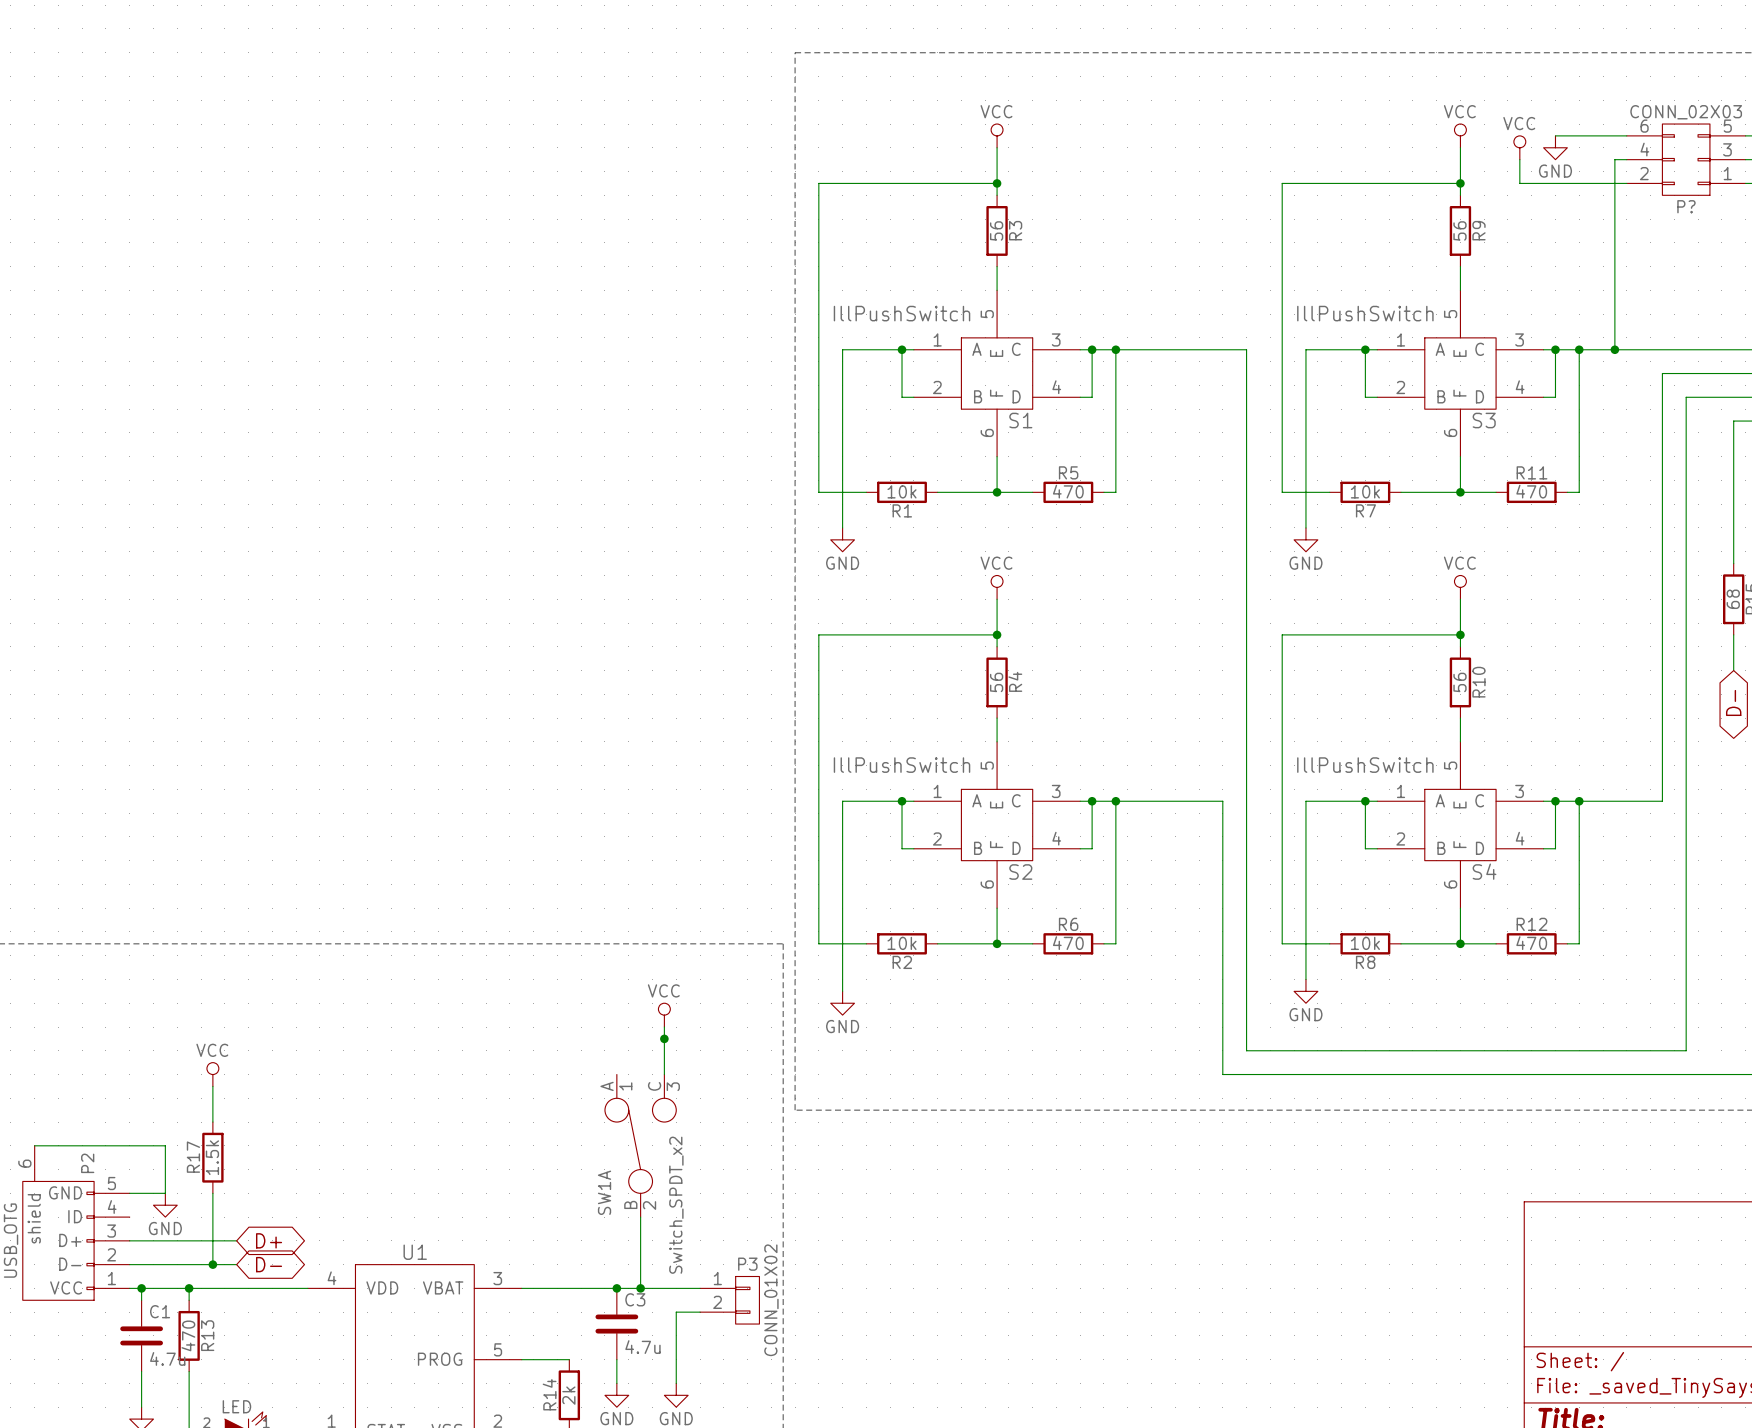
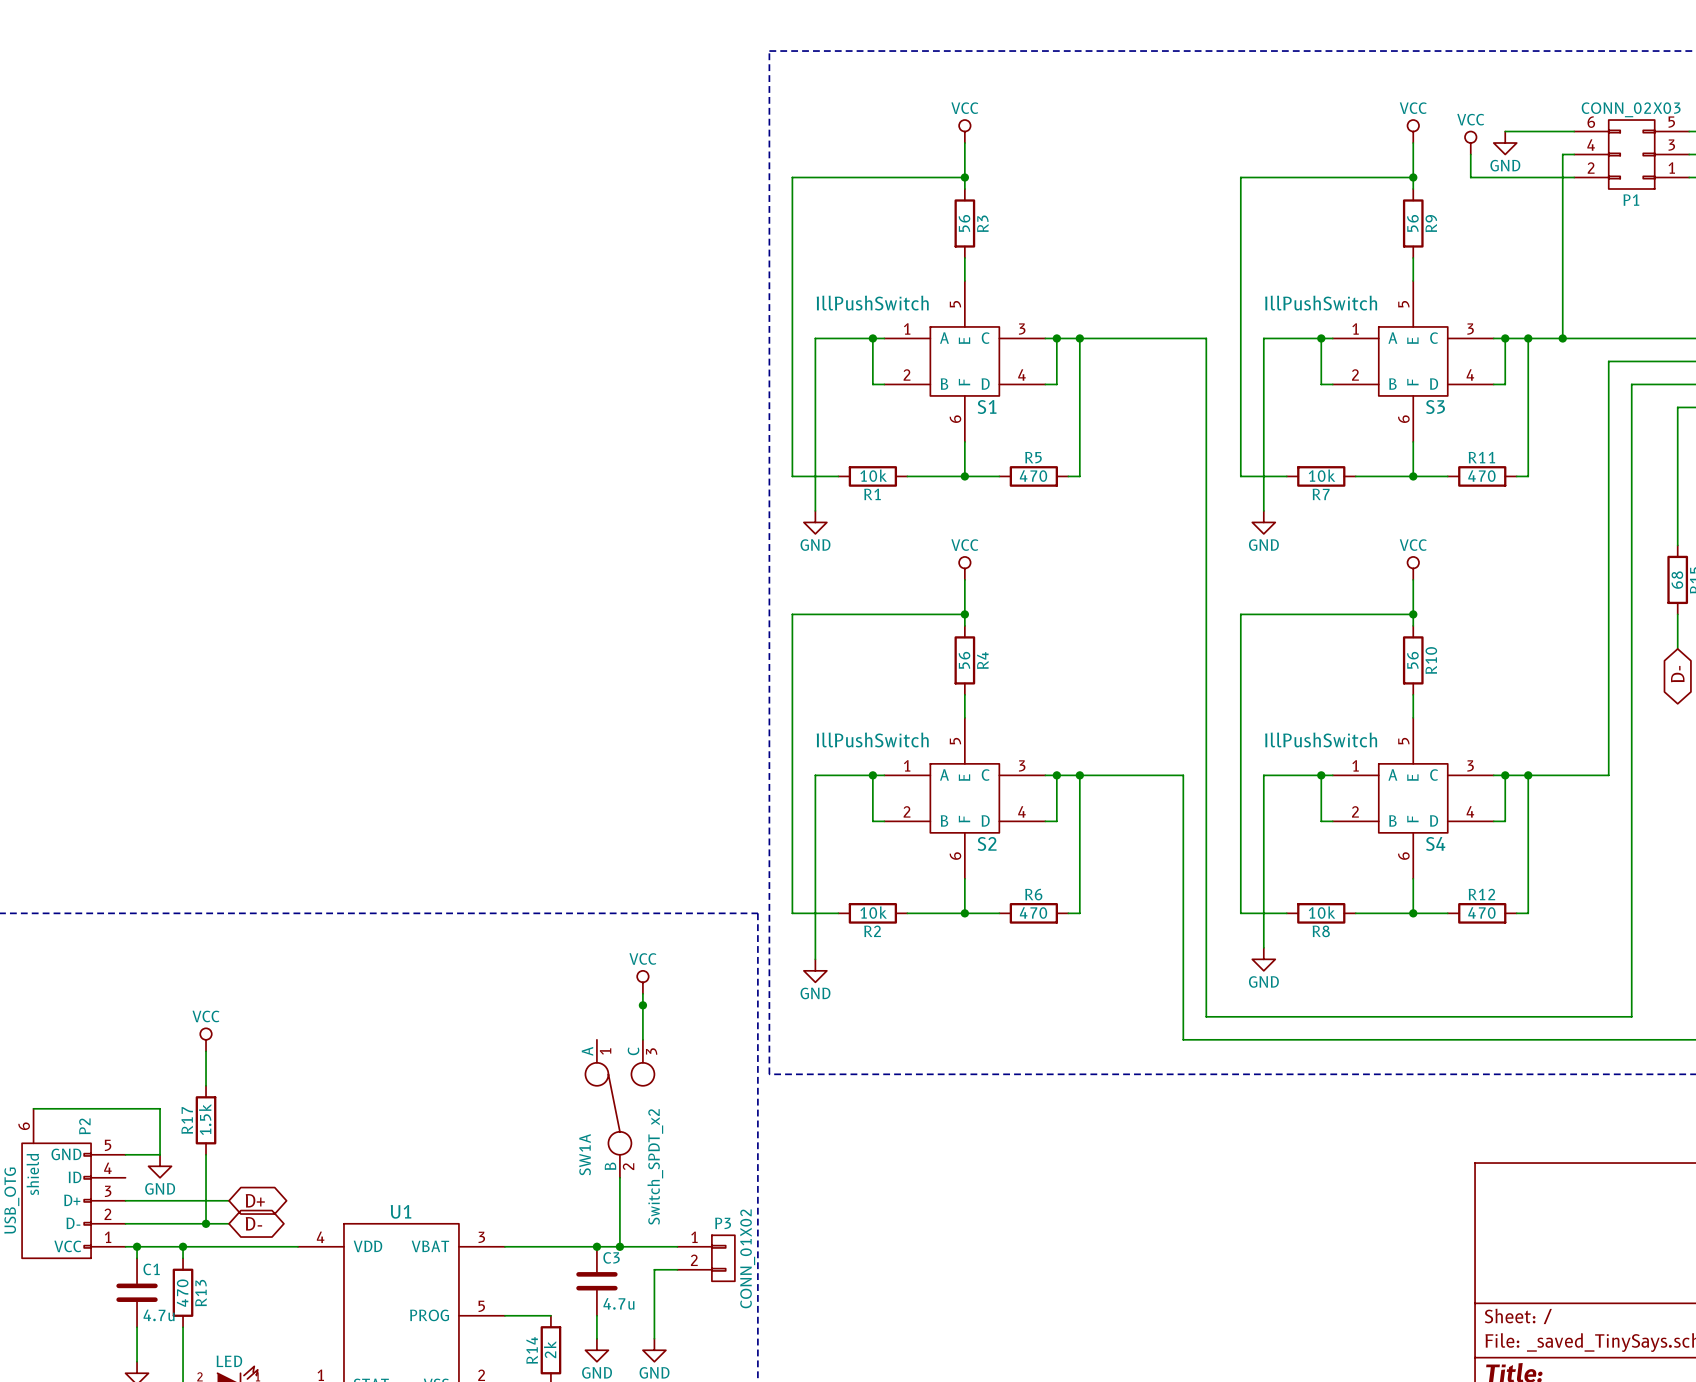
P? name: P? (1686, 206) -> P1 (1631, 200)

